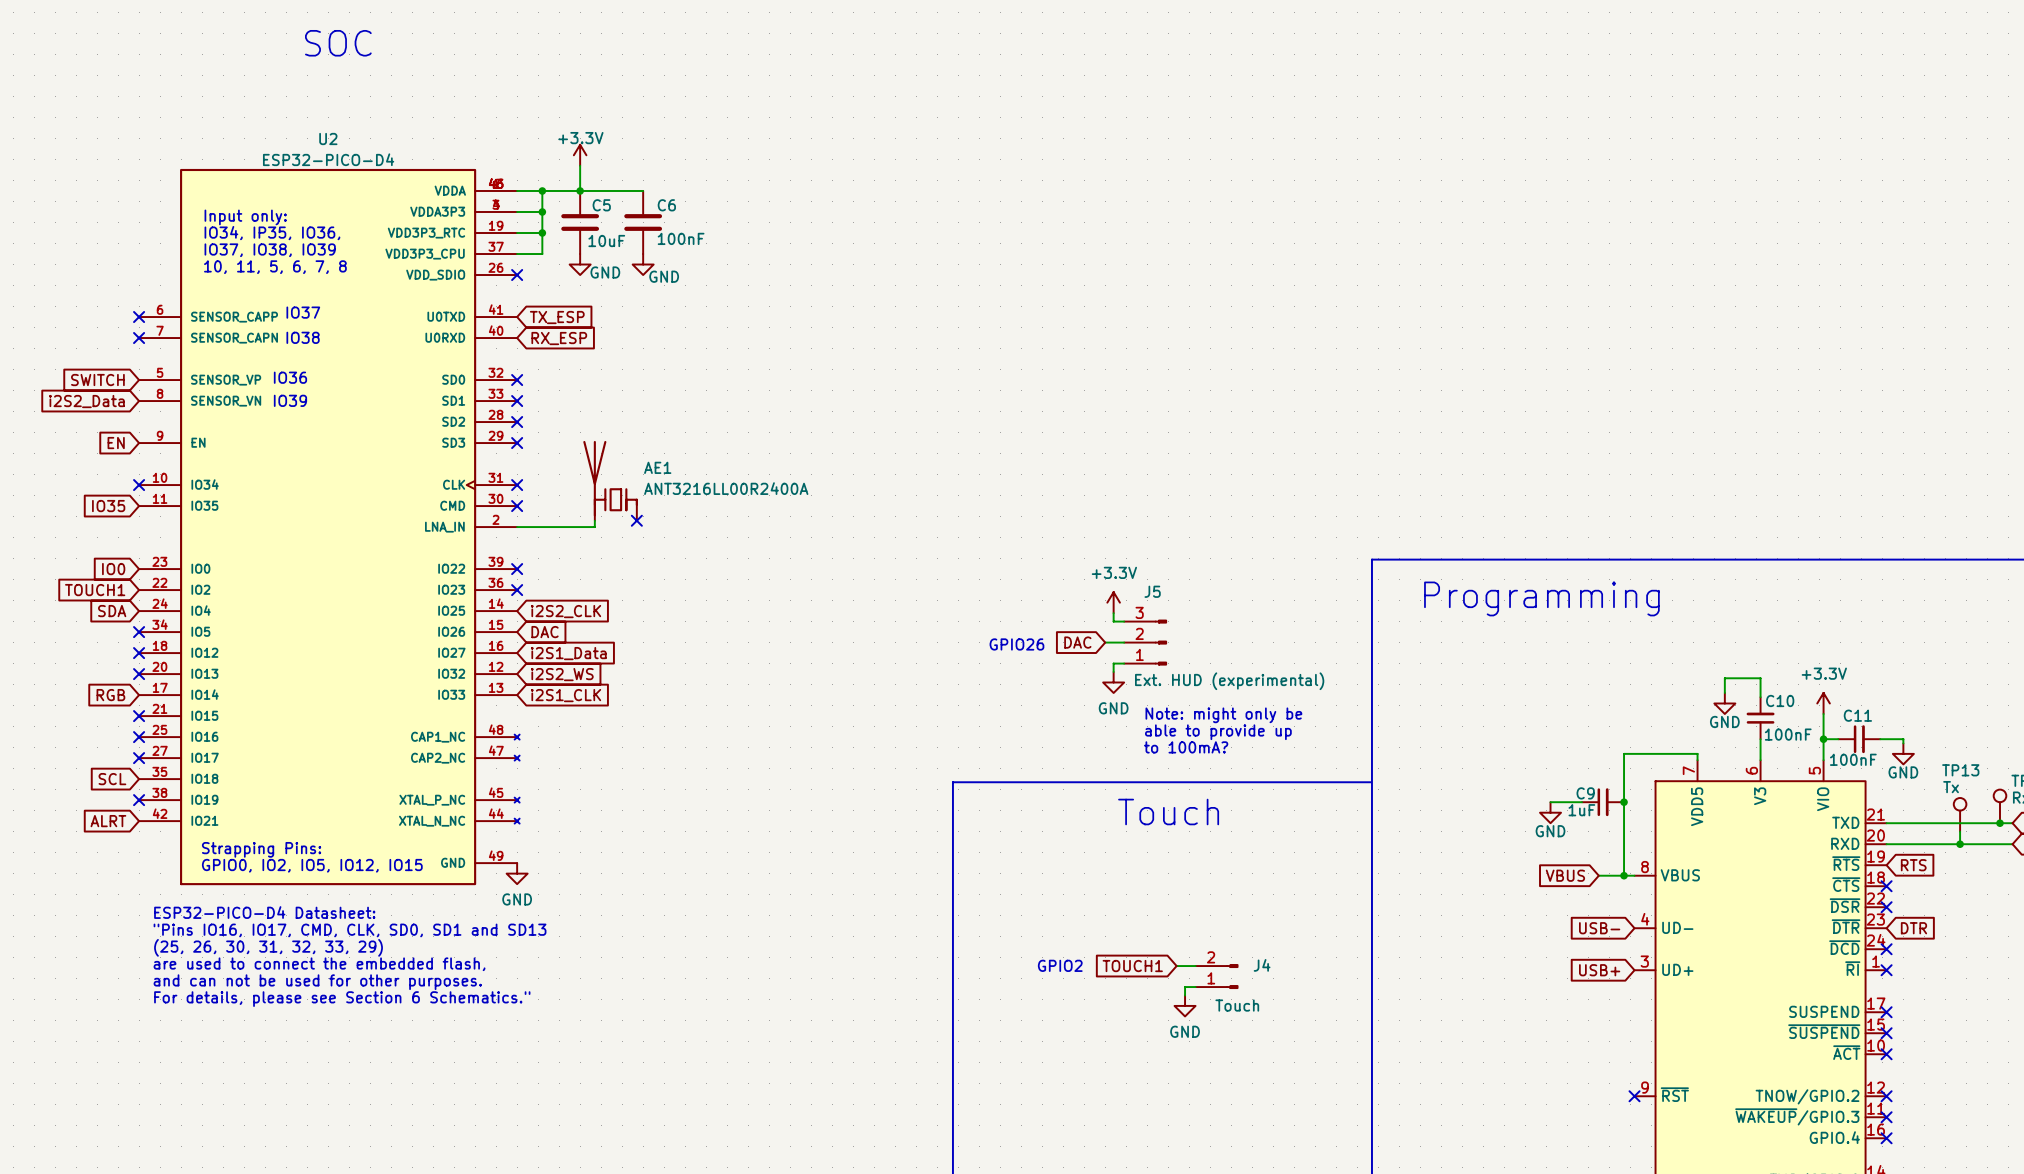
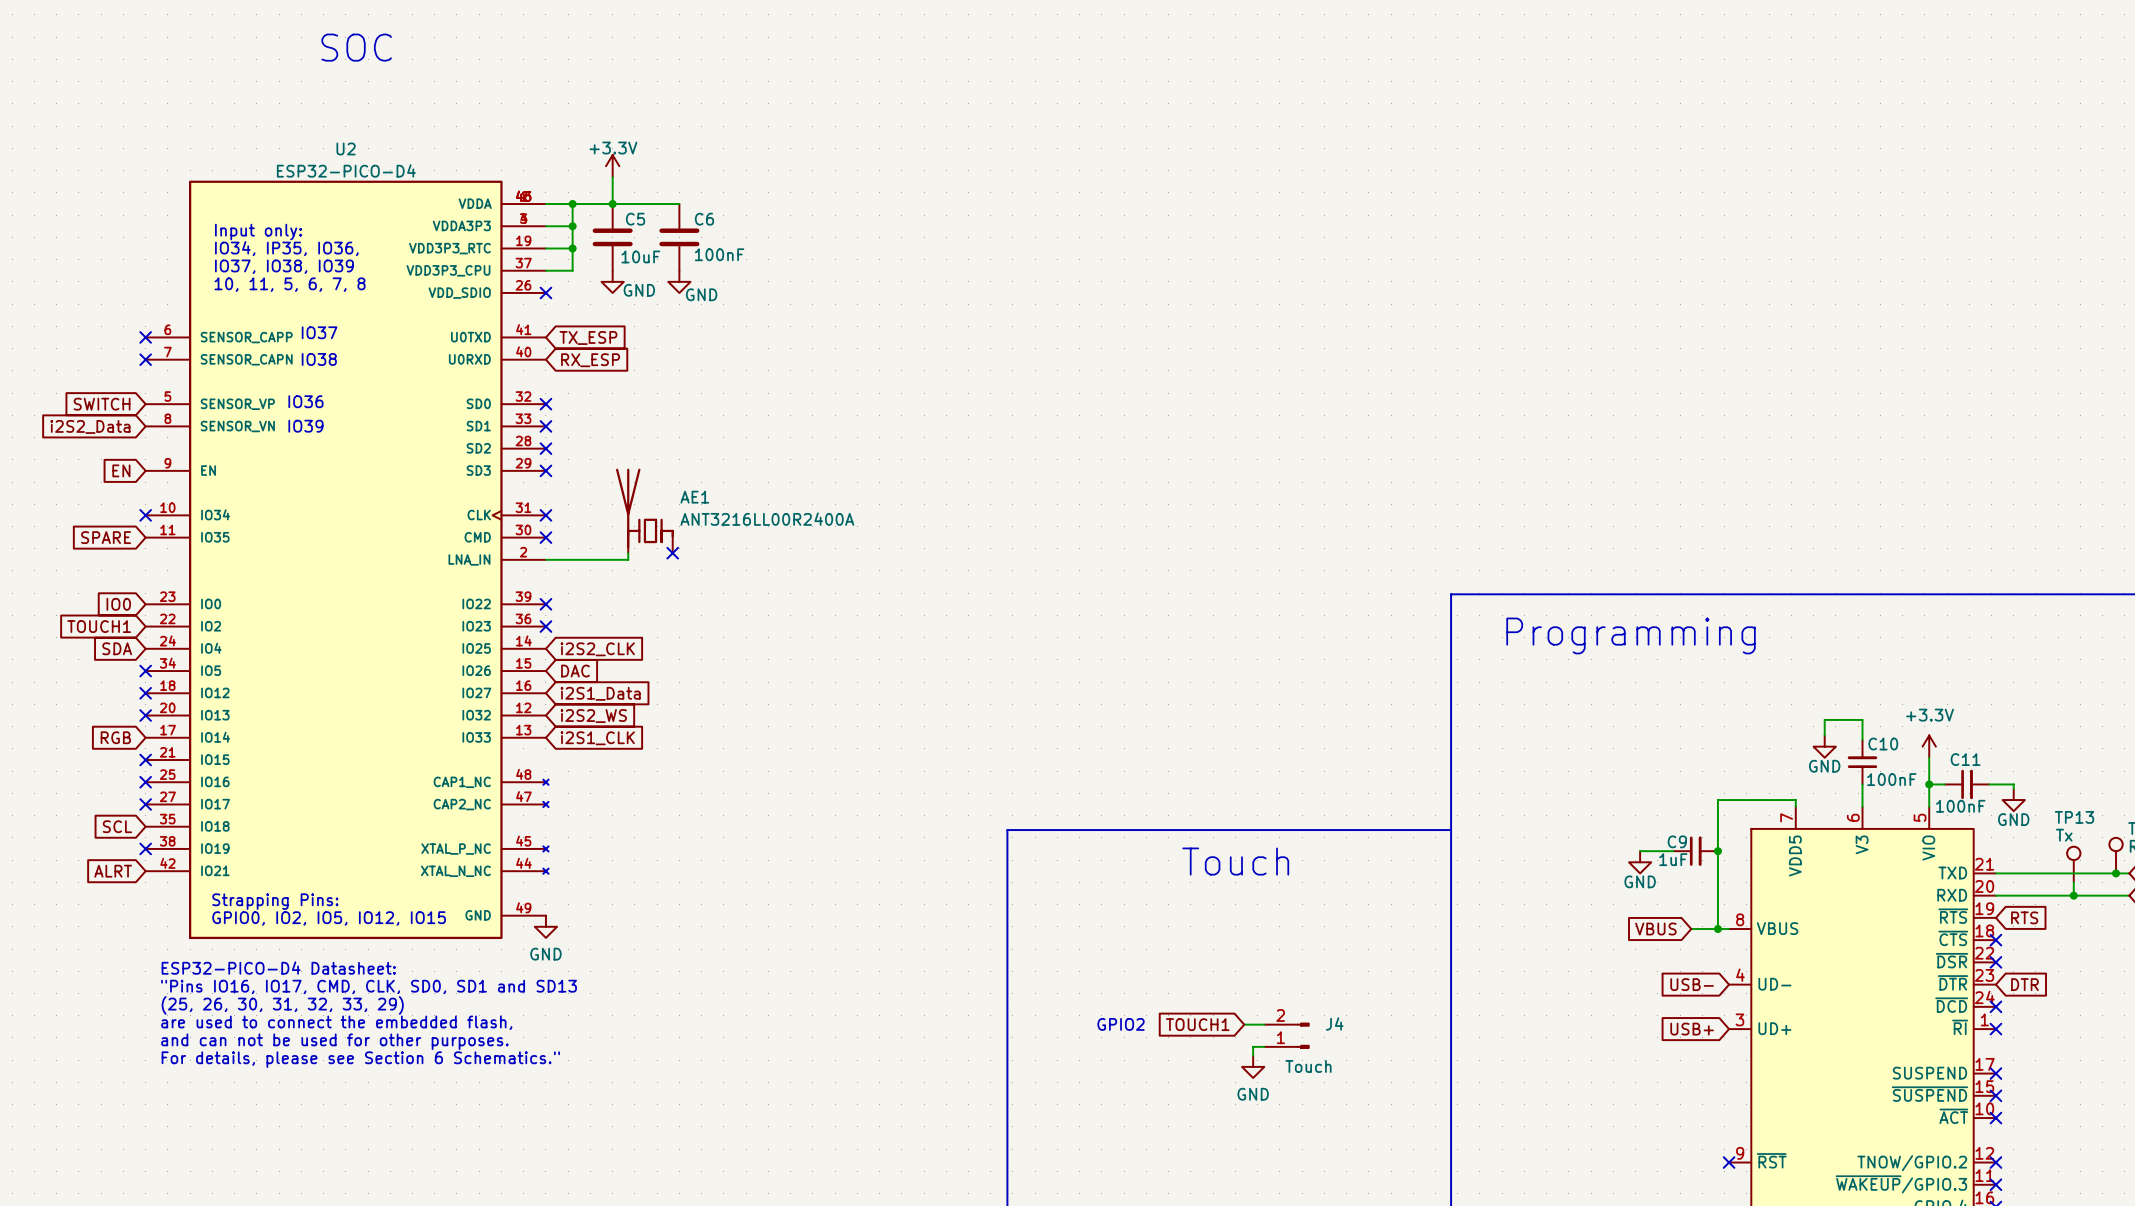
global label: IO35 (108, 506) -> SPARE (106, 537)
power symbol: +3.3V (1113, 602) -> none
wire: (1113, 613) (1113, 621) (1124, 621) -> none
global label: DAC (1077, 642) -> none
wire: (1105, 642) (1124, 642) -> none
J5: Ext. HUD (experimental) (1145, 642) -> none
text: GPIO26 (1016, 644) -> none
wire: (1124, 663) (1113, 663) (1113, 671) -> none
power symbol: GND (1113, 682) -> none
text: Note: might only be (1223, 715) -> none
text: able to provide up (1218, 732) -> none
text: to 100mA? (1186, 747) -> none

